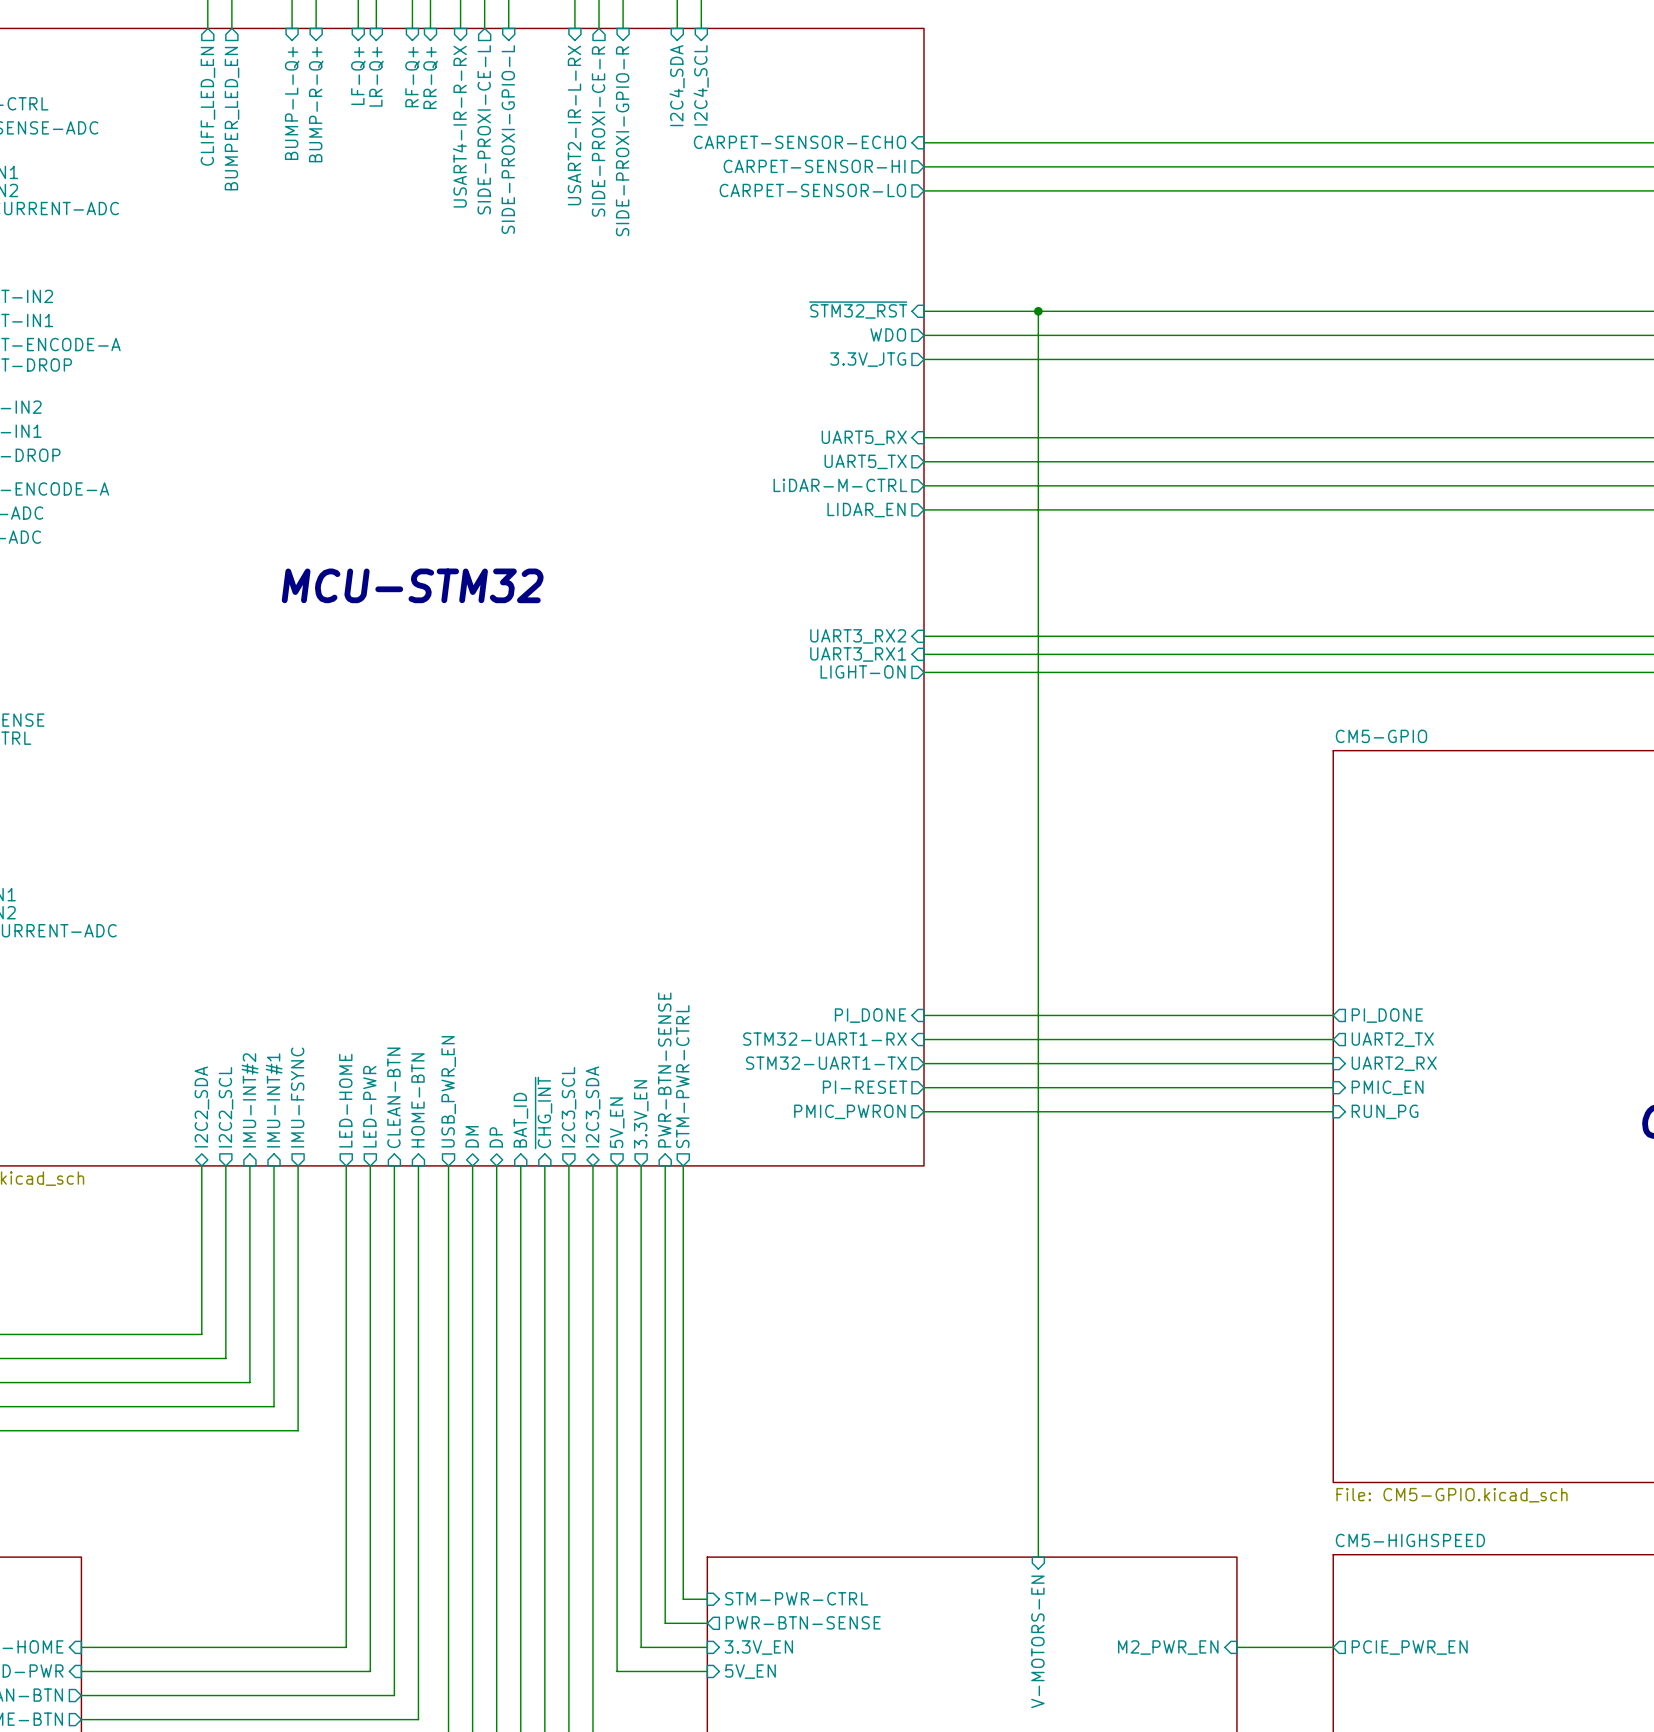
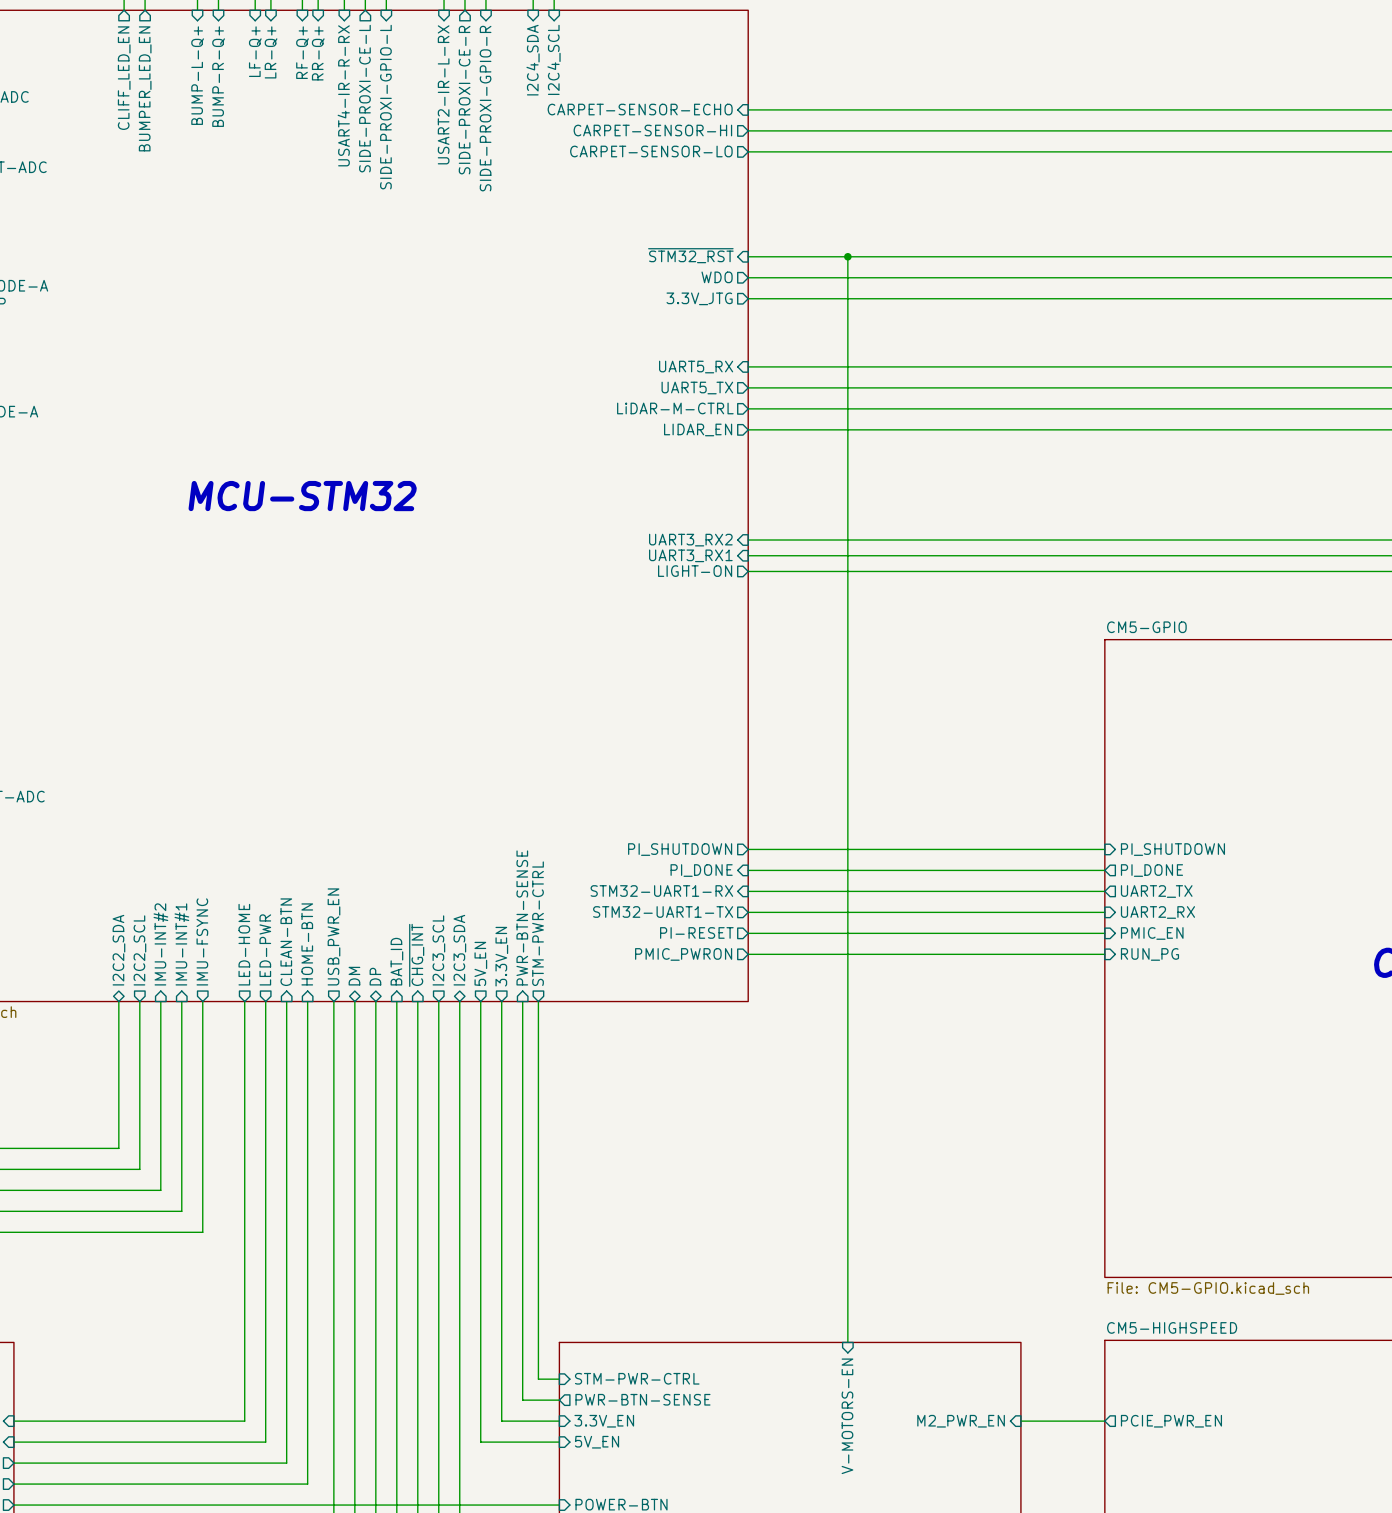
sheet pin: none -> PI_SHUTDOWN (680, 849)
wire: none -> (748, 849) (1104, 849)
sheet pin: none -> PI_SHUTDOWN (1172, 849)

